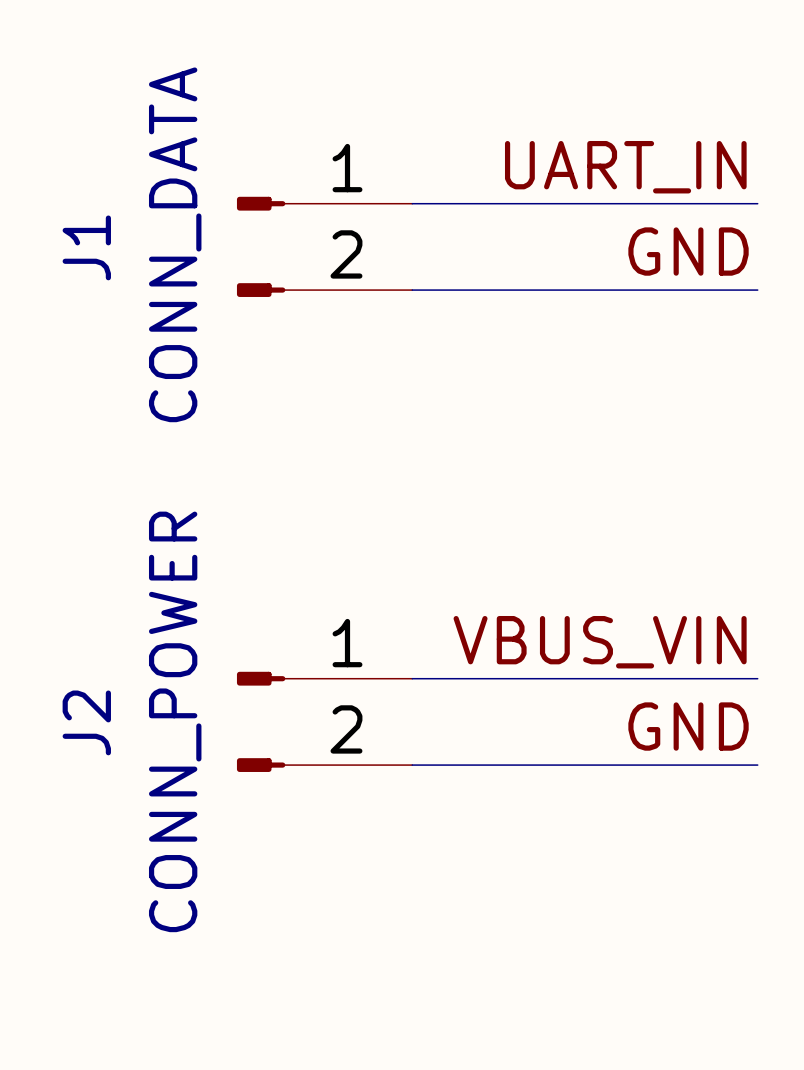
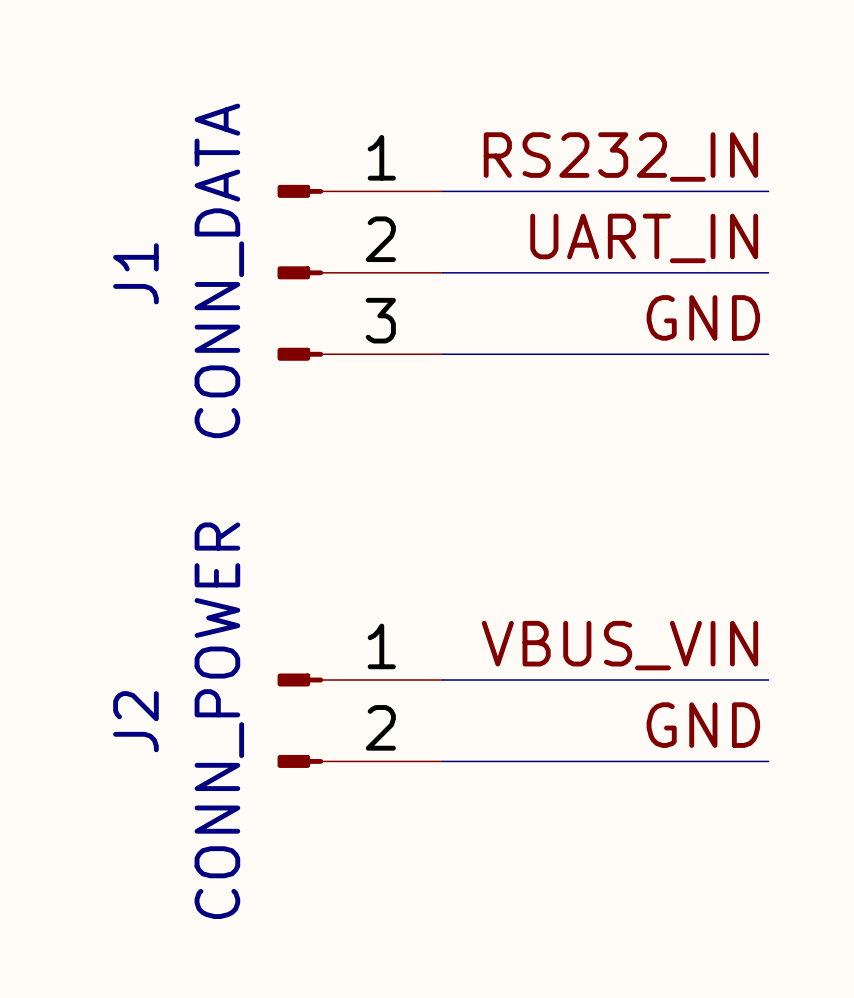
label: none -> RS232_IN (620, 156)
wire: none -> (442, 191) (768, 191)
label position: UART_IN (625, 167) -> UART_IN (644, 238)
J1 symbol: [236, 196, 413, 297] -> [277, 184, 443, 361]
wire: (412, 203) (757, 203) -> (442, 272) (768, 272)
label position: GND (688, 251) -> GND (703, 317)
wire: (412, 290) (757, 290) -> (442, 354) (768, 354)

